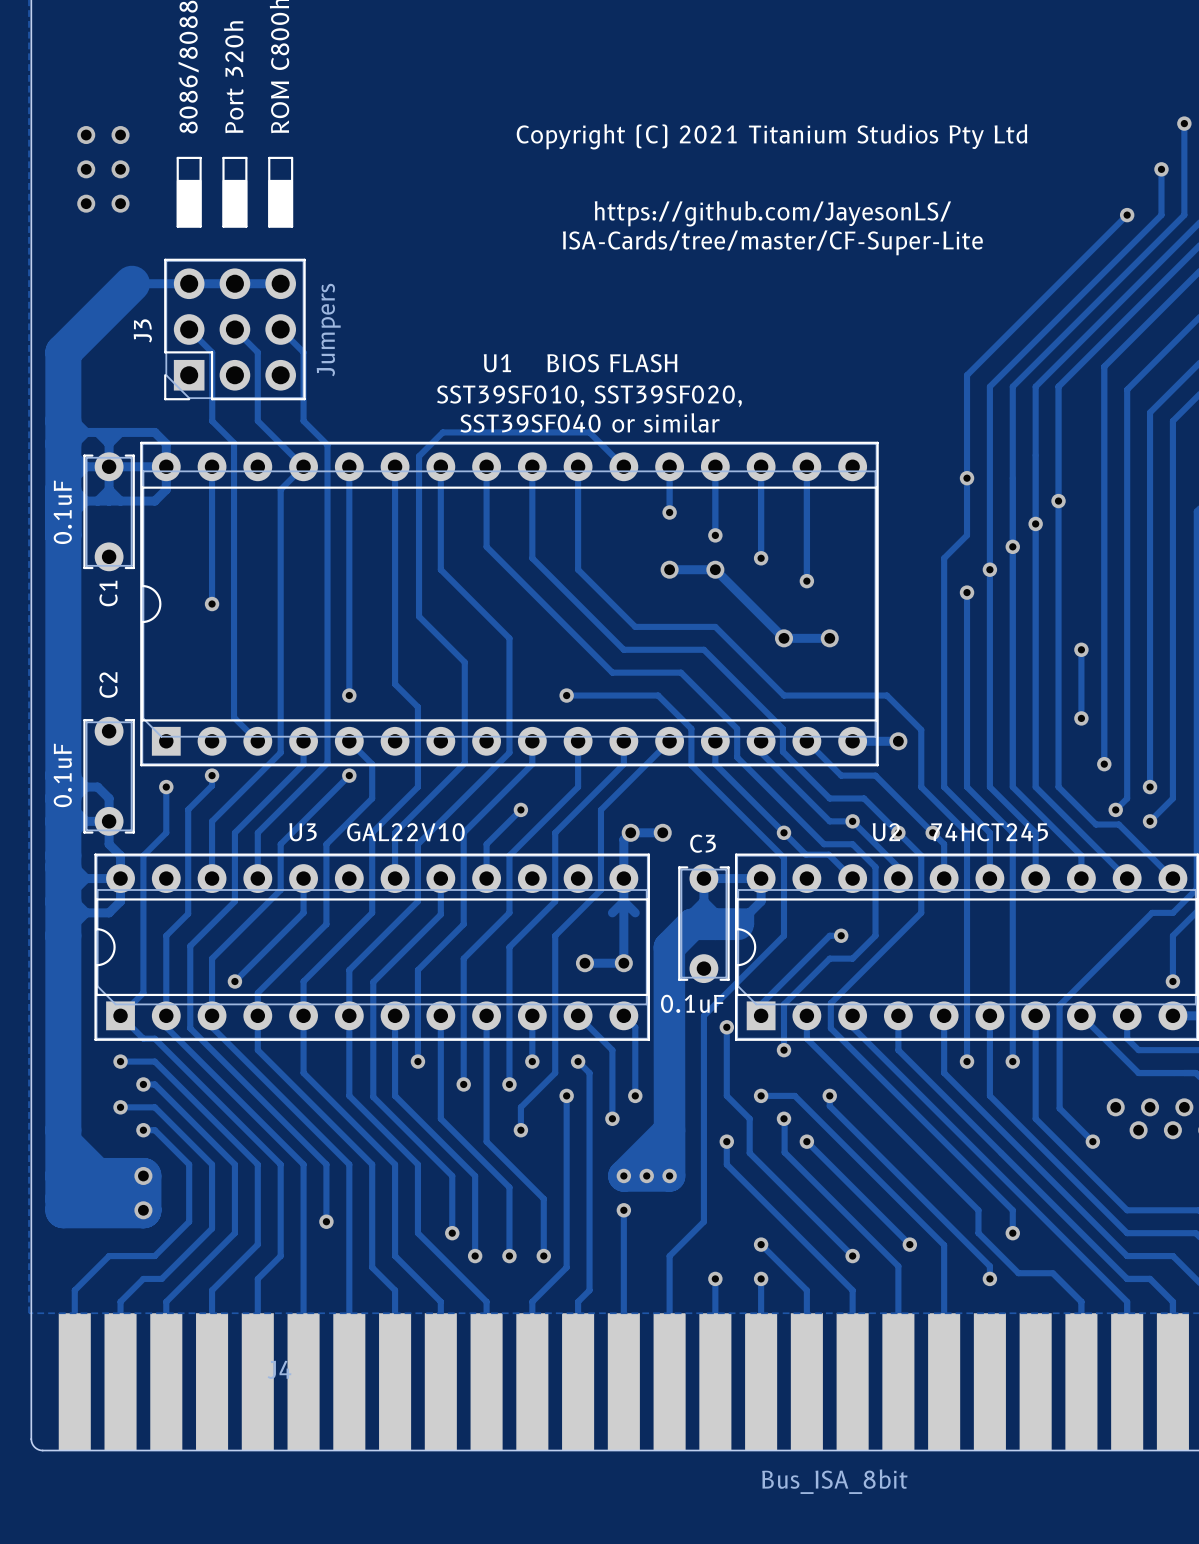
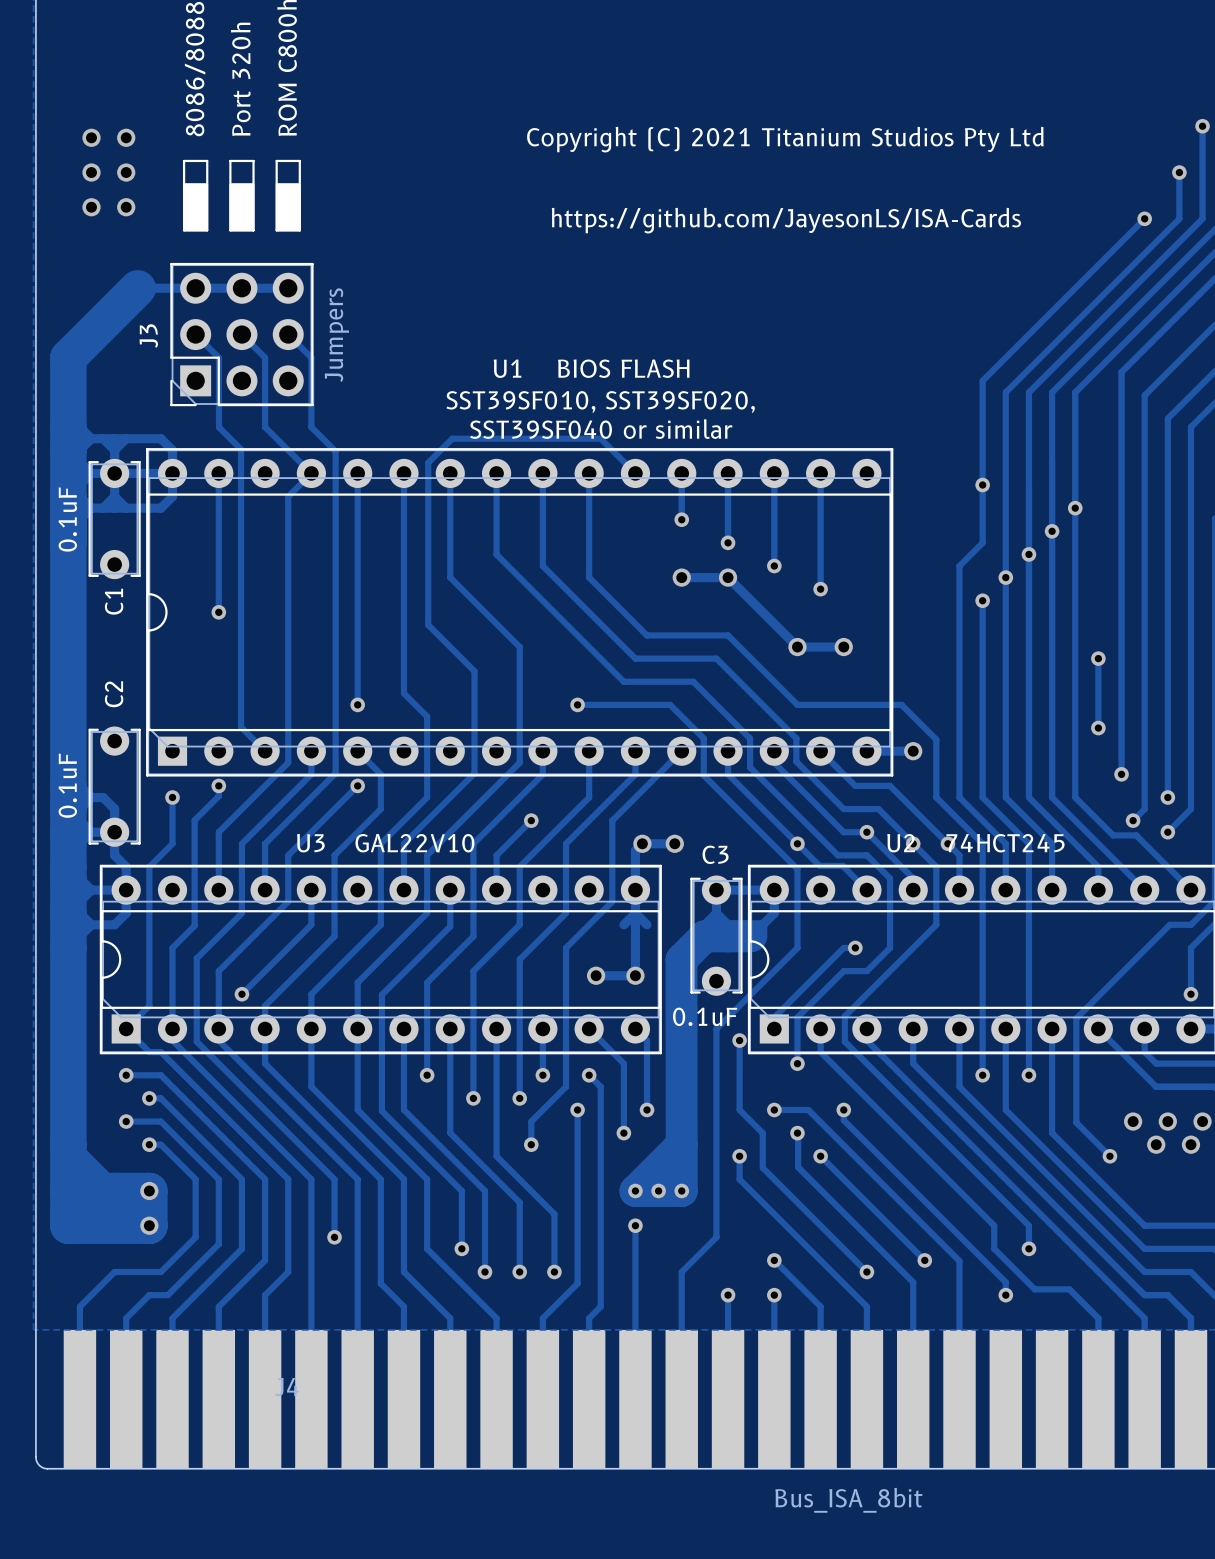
text: https://github.com/JayesonLS/ (772, 213) -> https://github.com/JayesonLS/ISA-Cards (786, 220)
text: ISA-Cards/tree/master/CF-Super-Lite (772, 242) -> none

